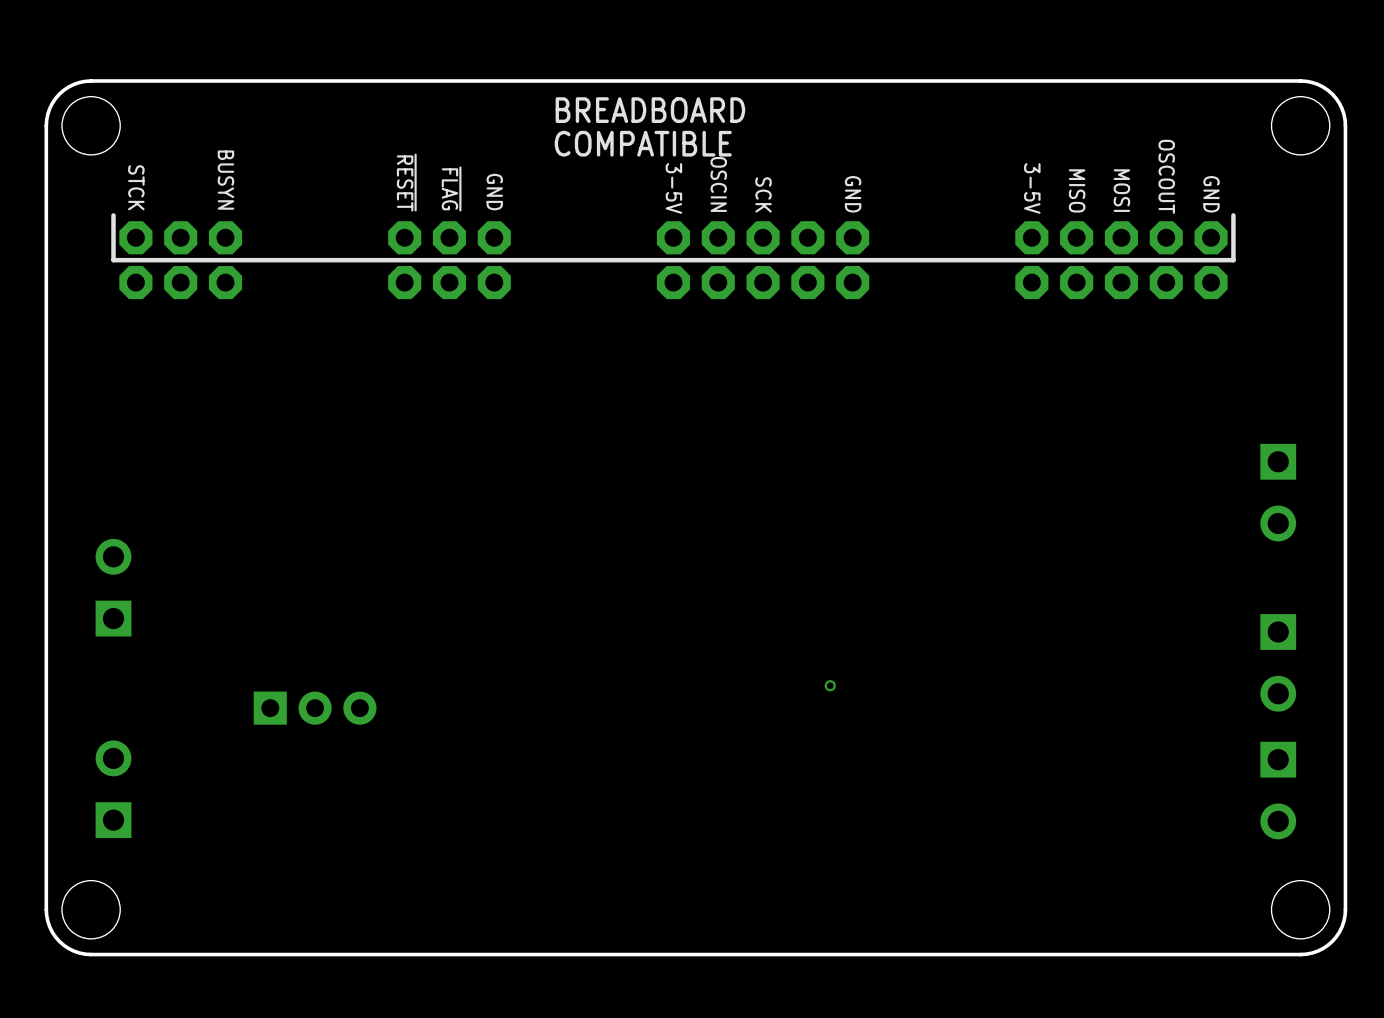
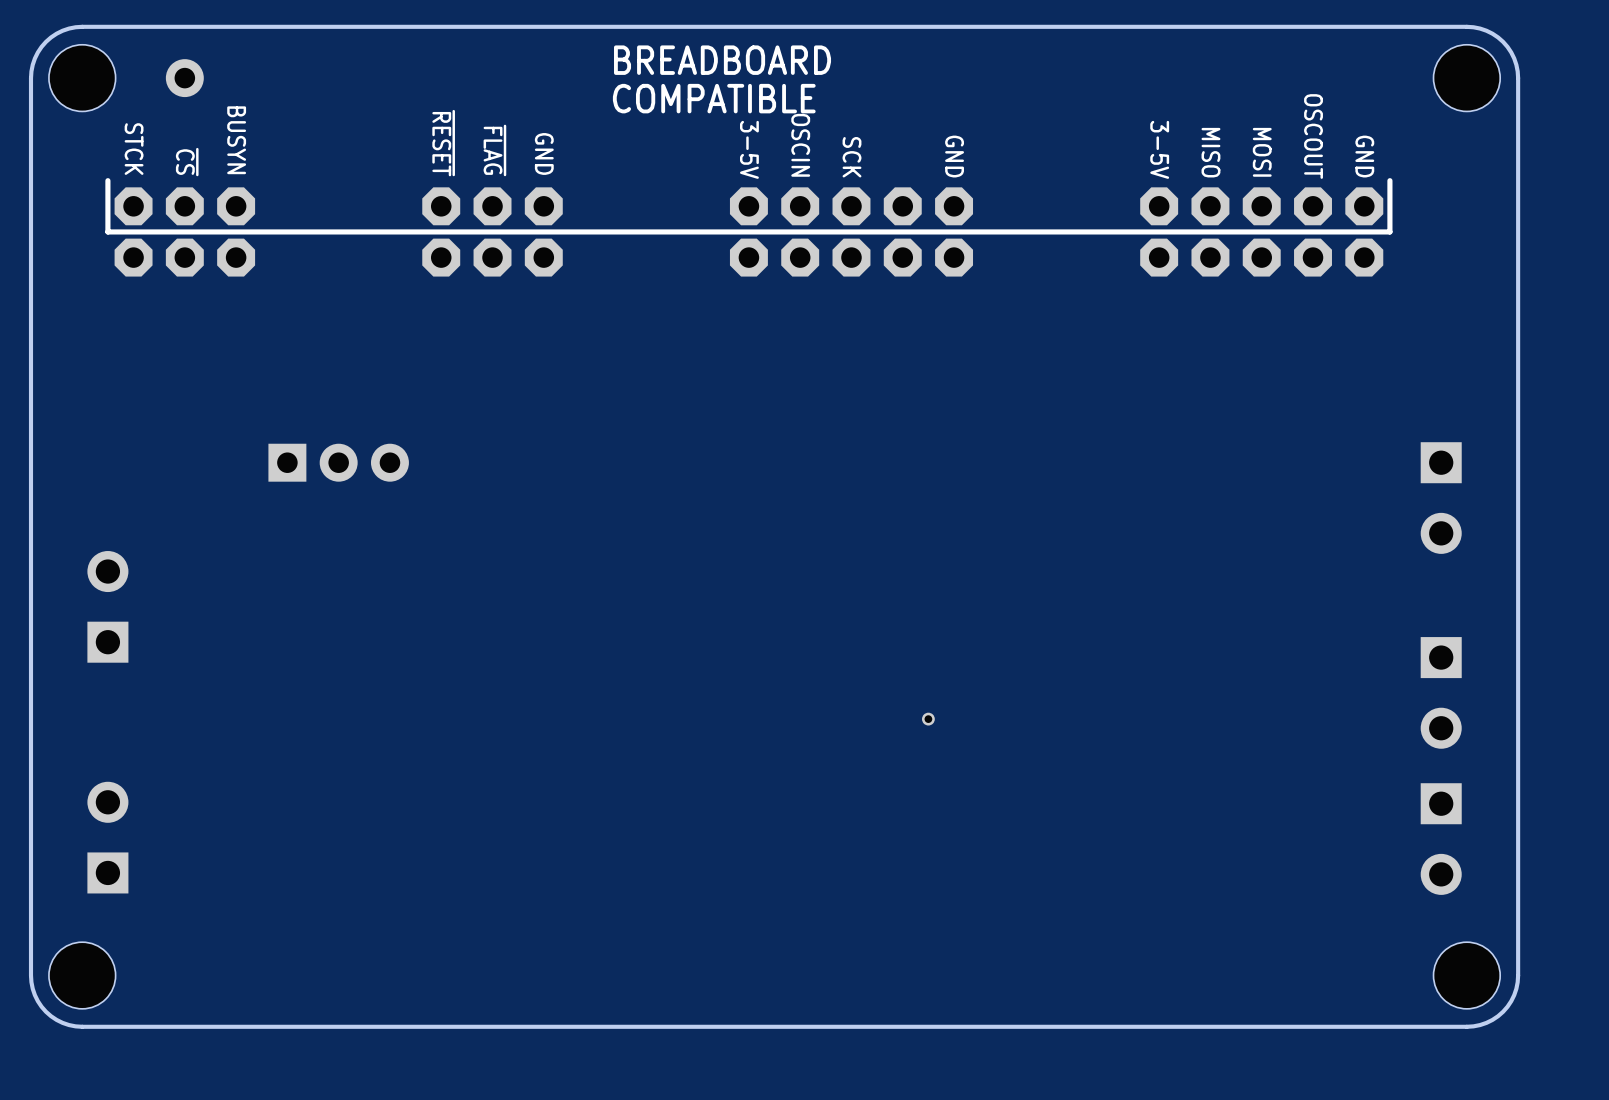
part: none -> (184, 78)
text: none -> ~{CS} (187, 162)
part position: (315, 708) -> (338, 462)

